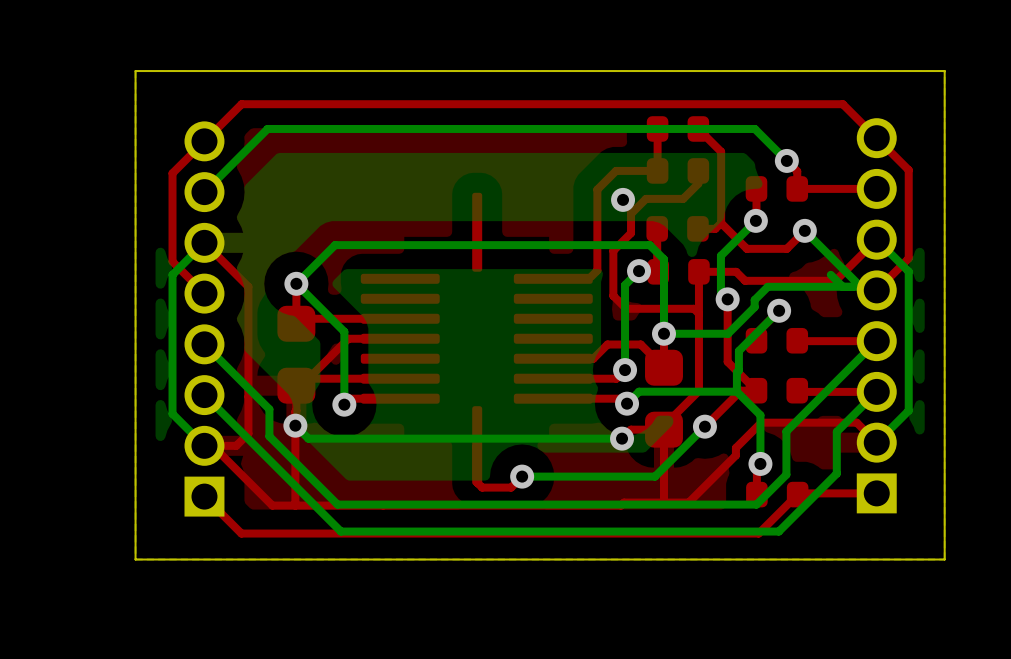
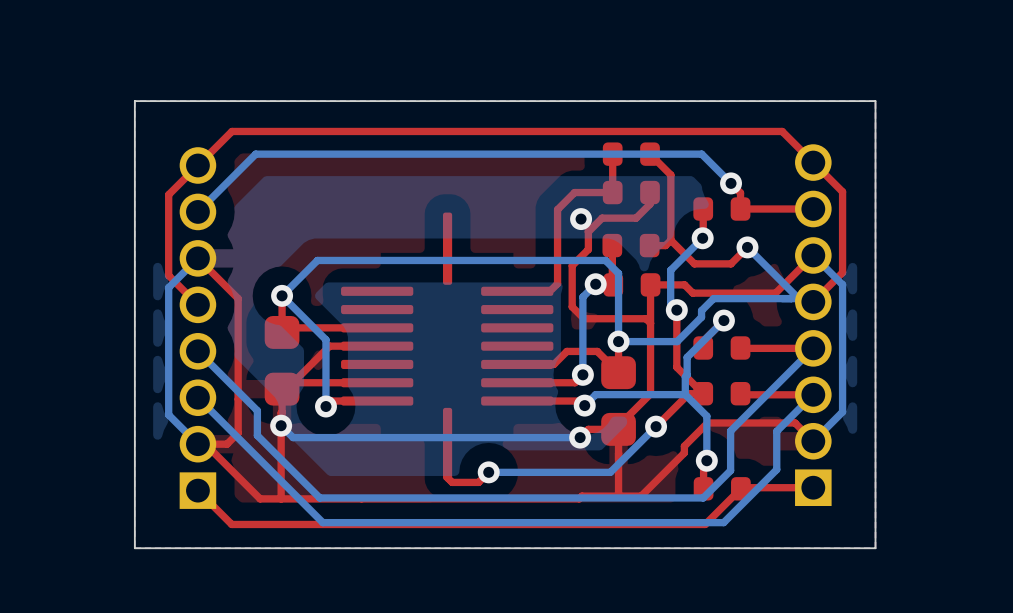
bottom track: (830, 274) (842, 286) -> none

